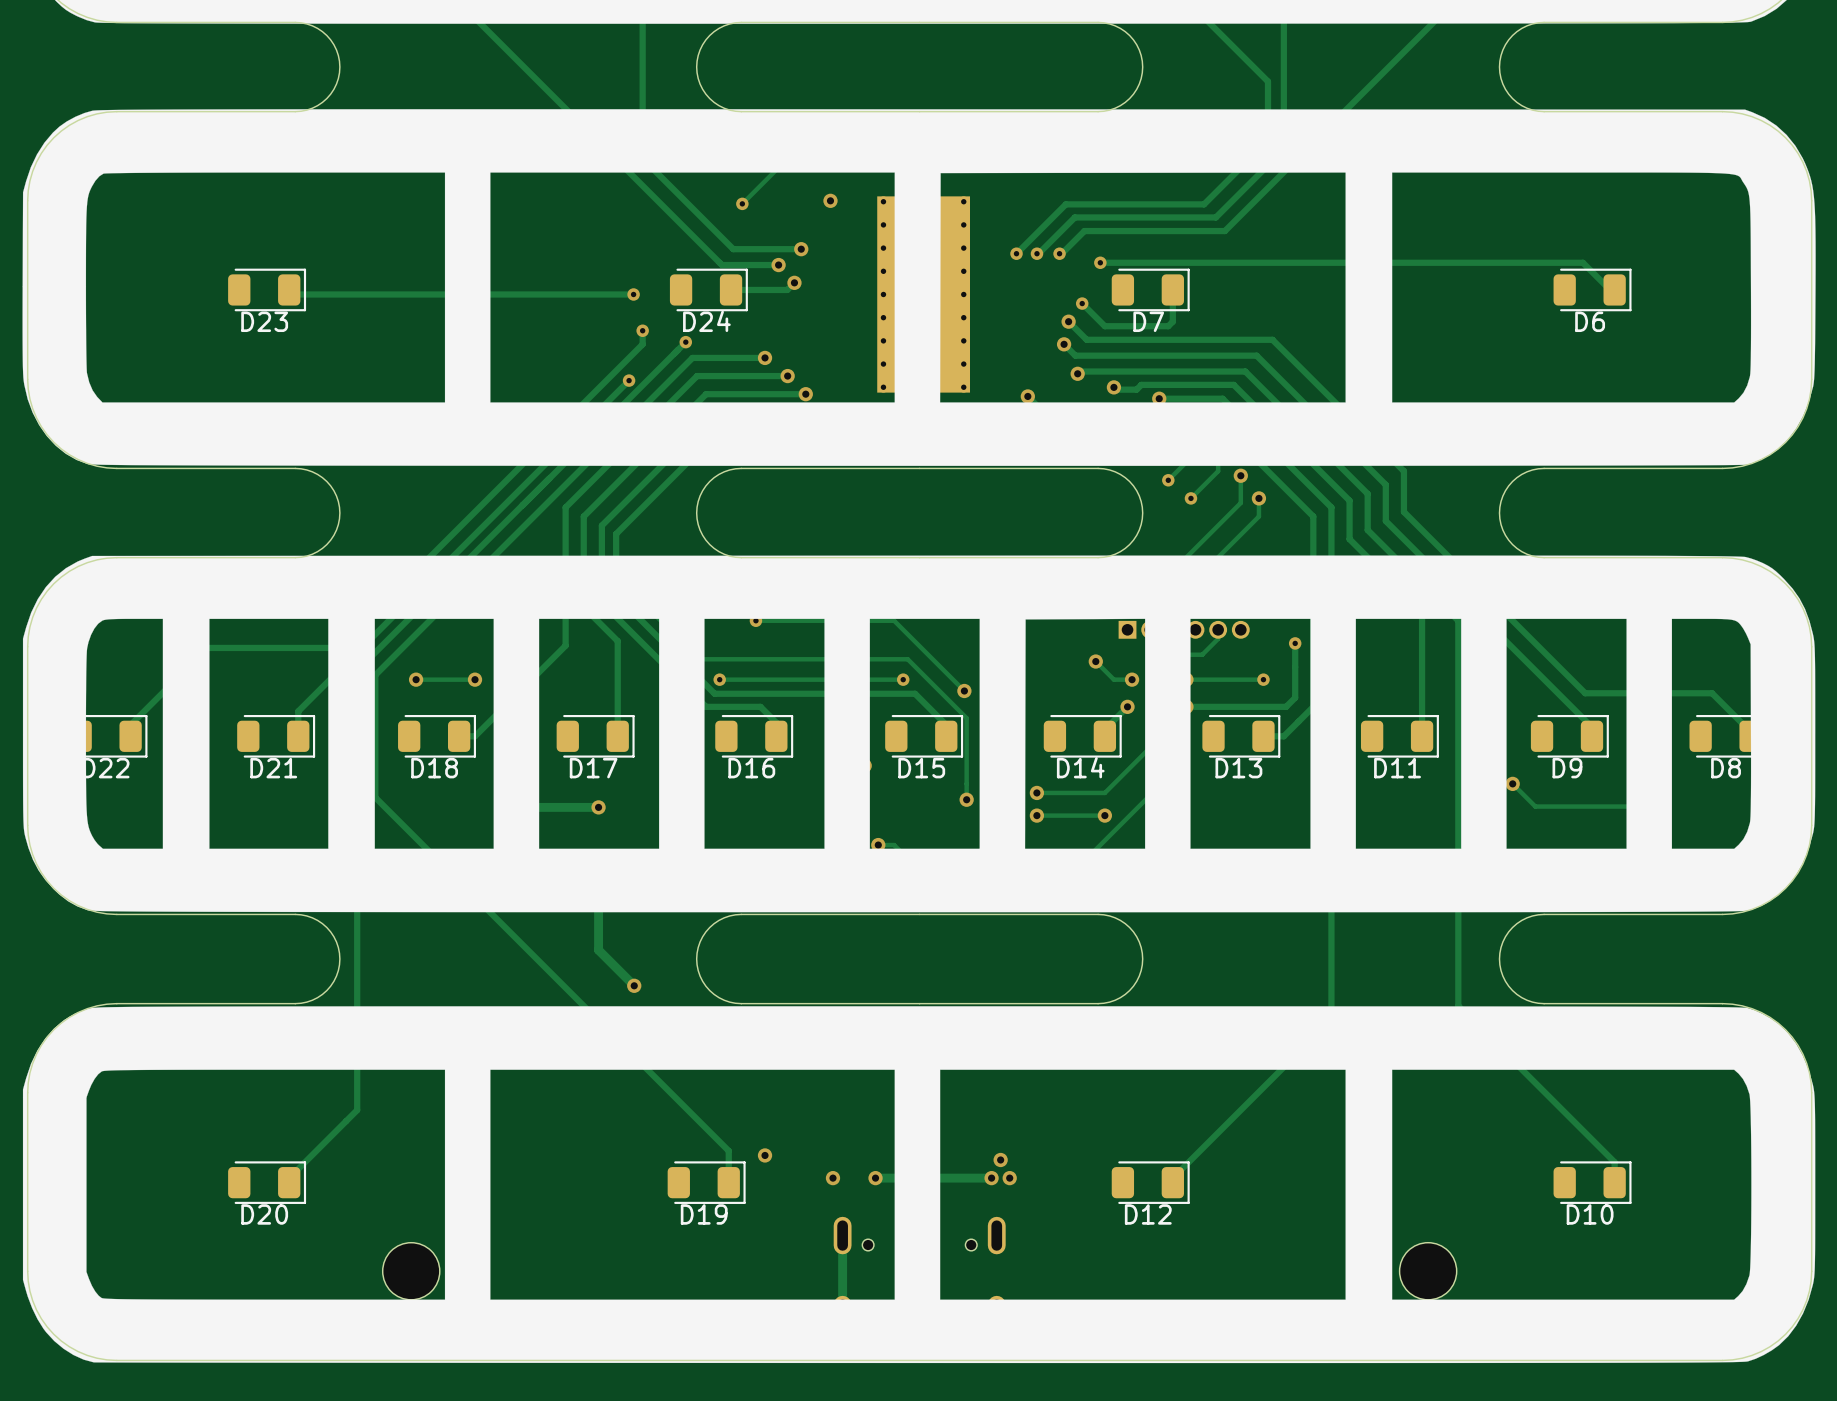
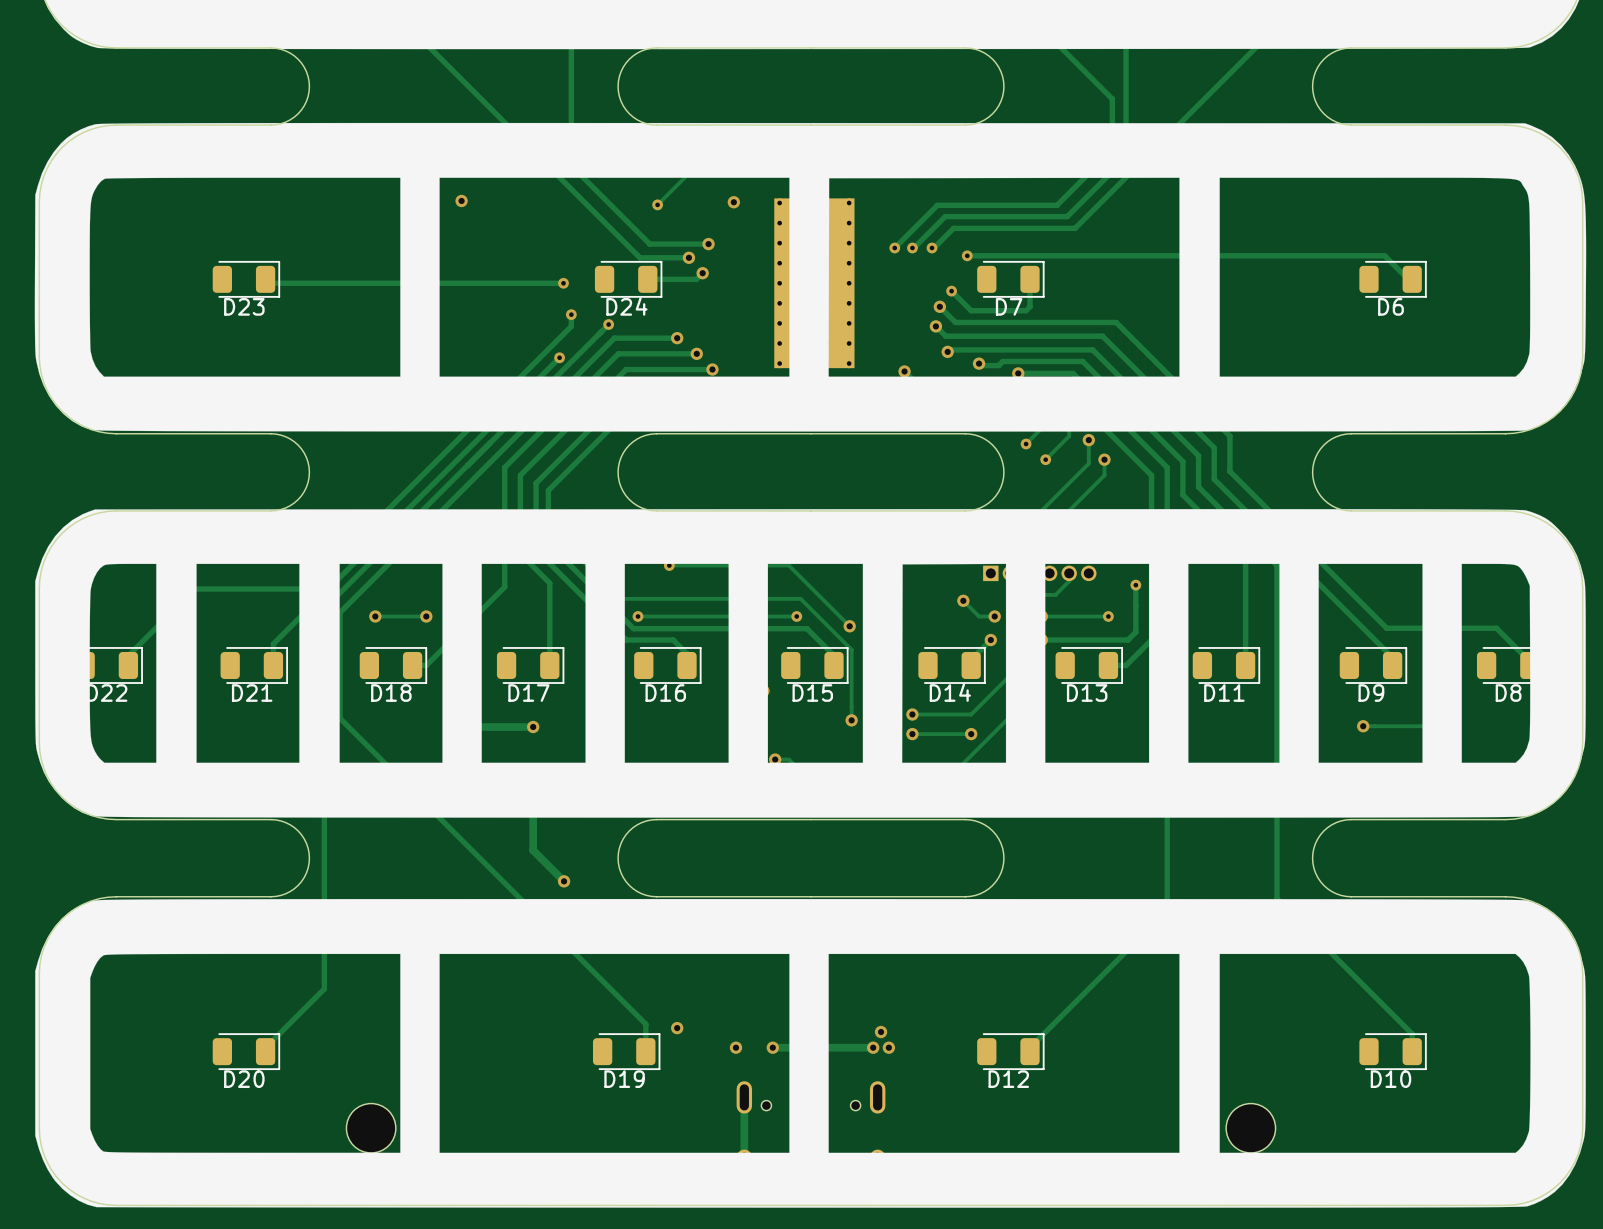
via: none -> (461, 200)
track: (1512, 783) (1535, 806) (1558, 806) -> none
via position: (1512, 783) -> (1363, 726)

